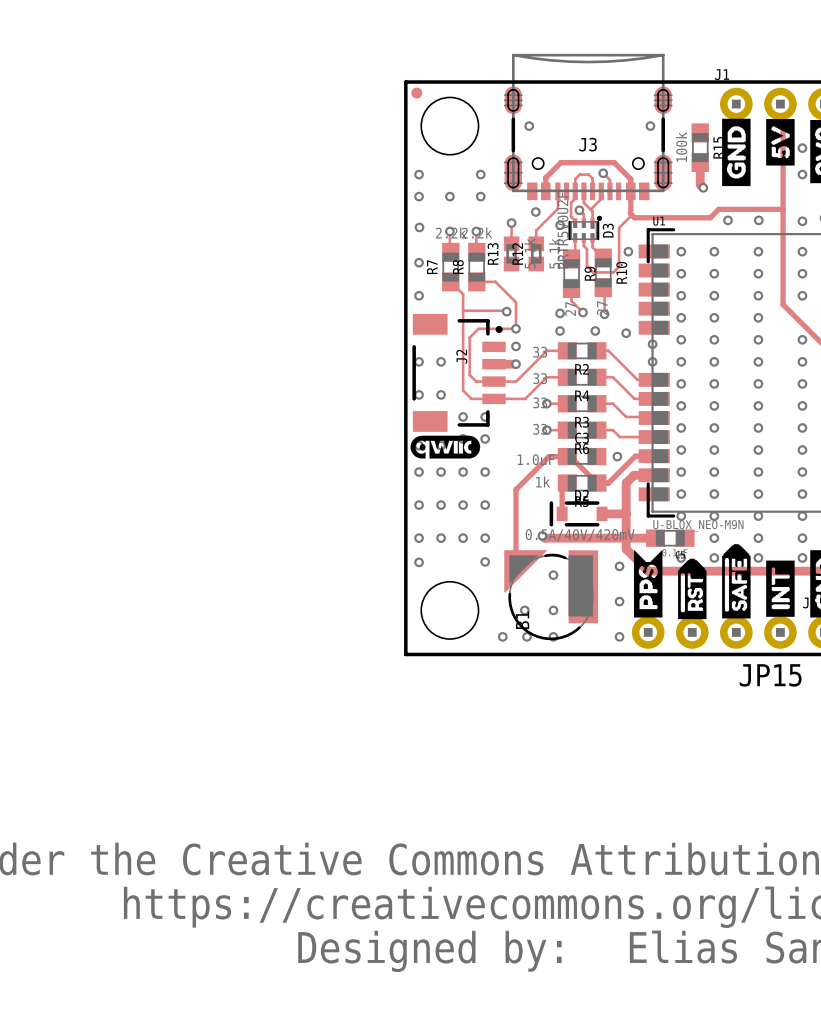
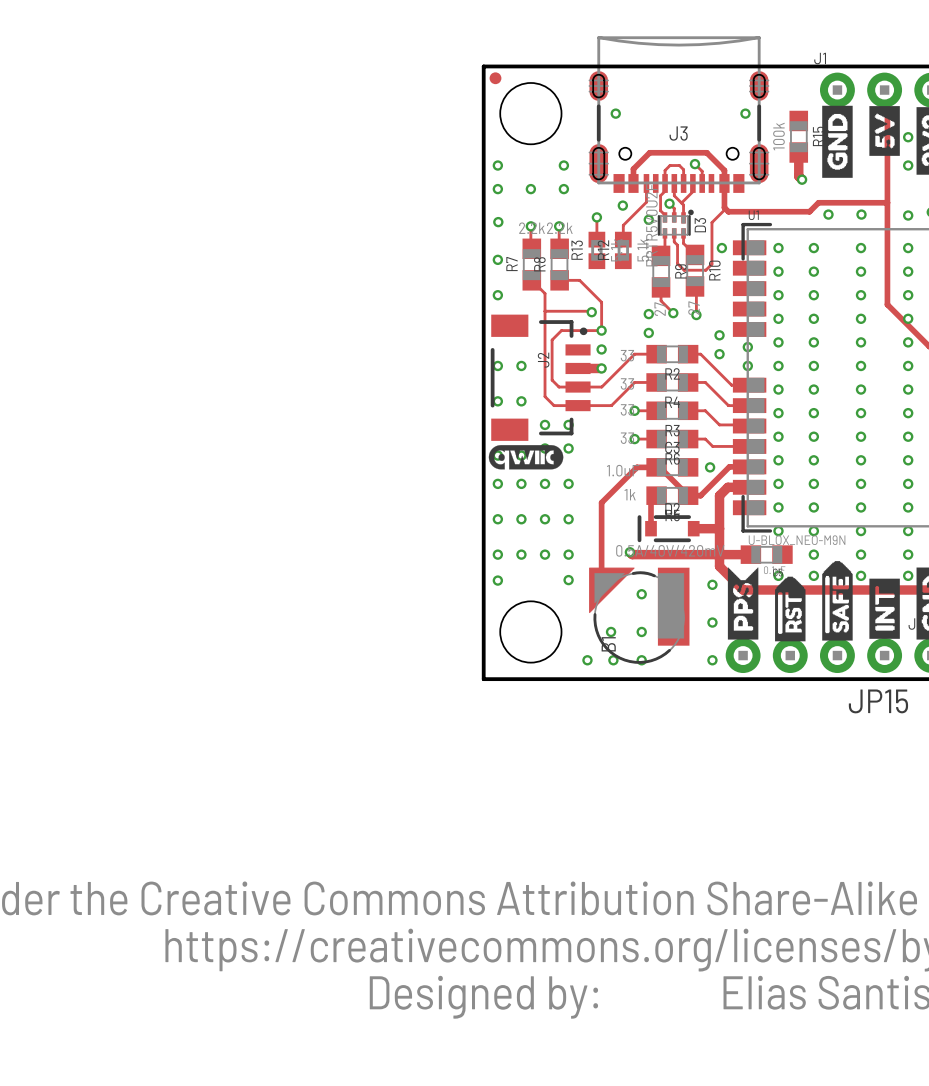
via: none -> (908, 318)
via position: (595, 331) -> (719, 354)

